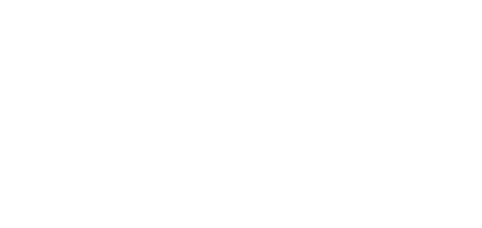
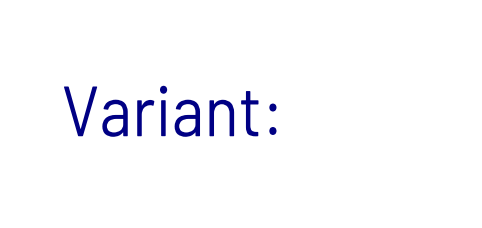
text: none -> Variant: (170, 111)

